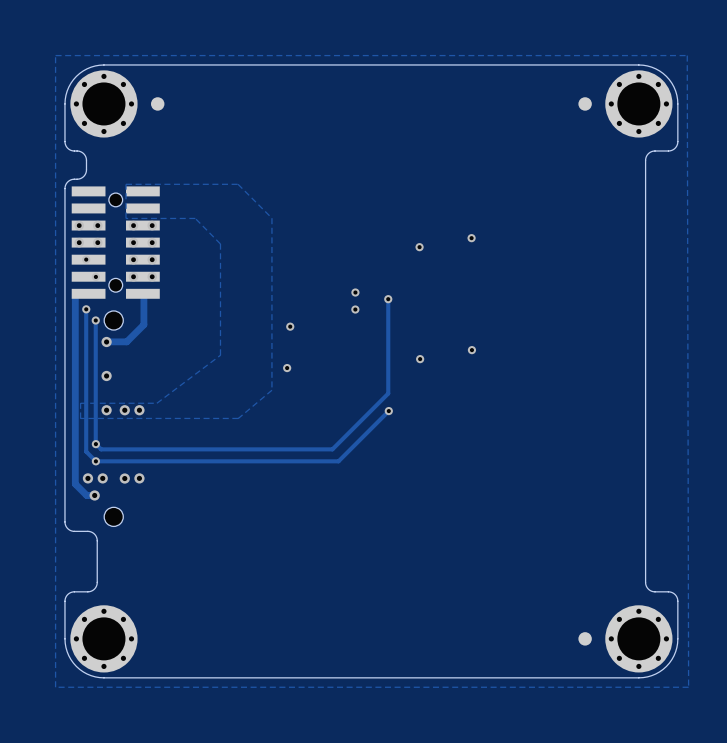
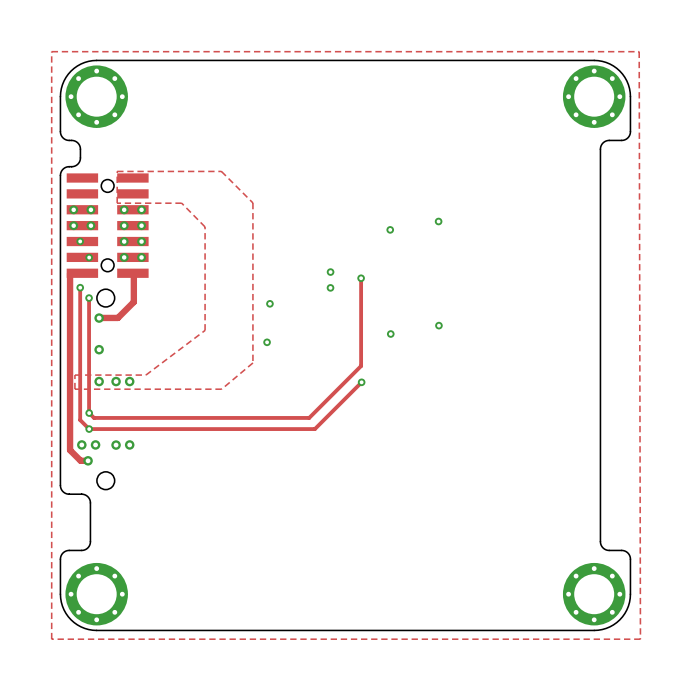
part: (157, 103) -> none
part: (585, 103) -> none
part: (585, 638) -> none

